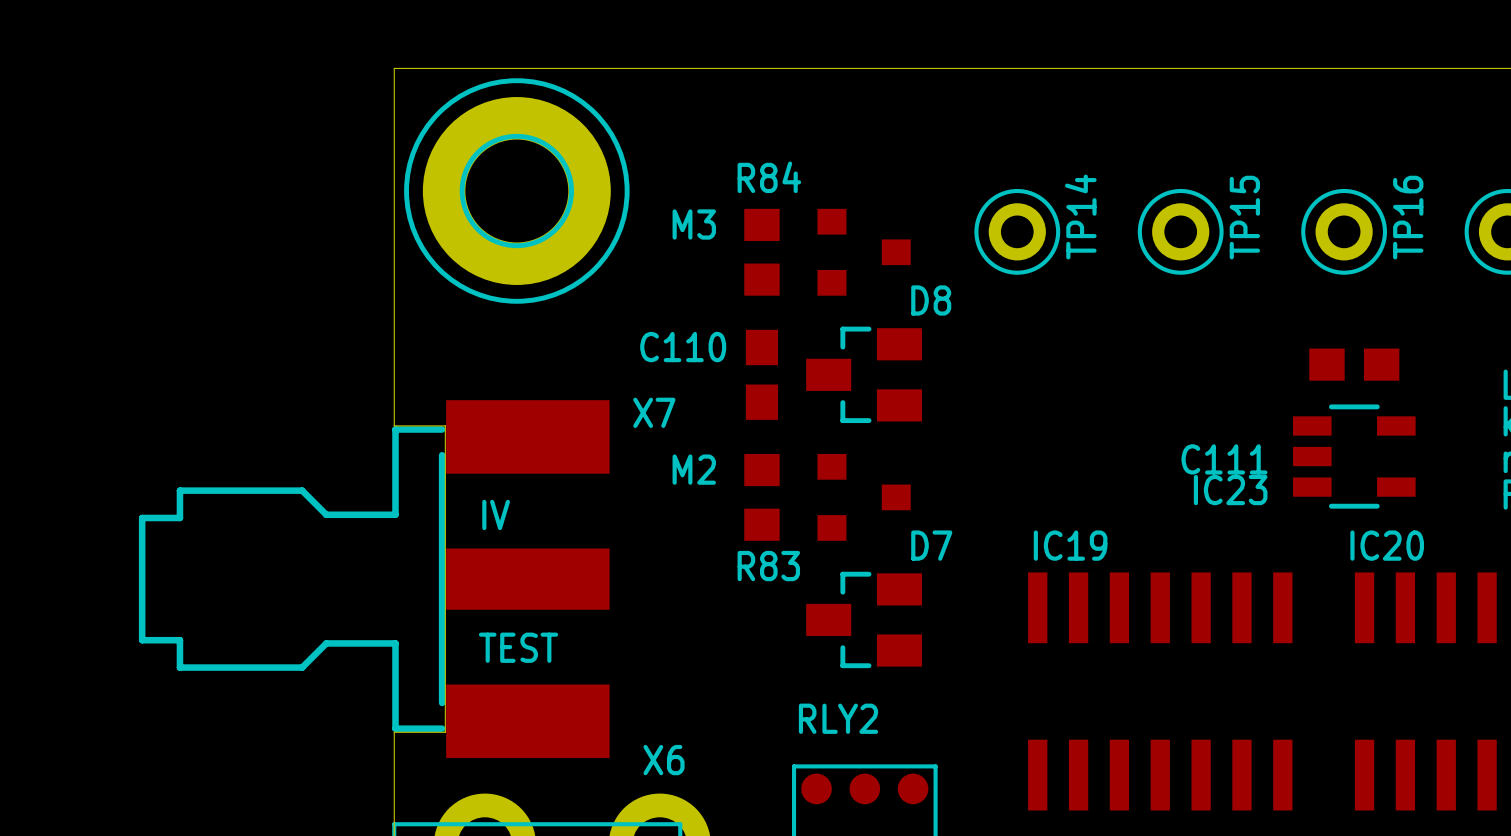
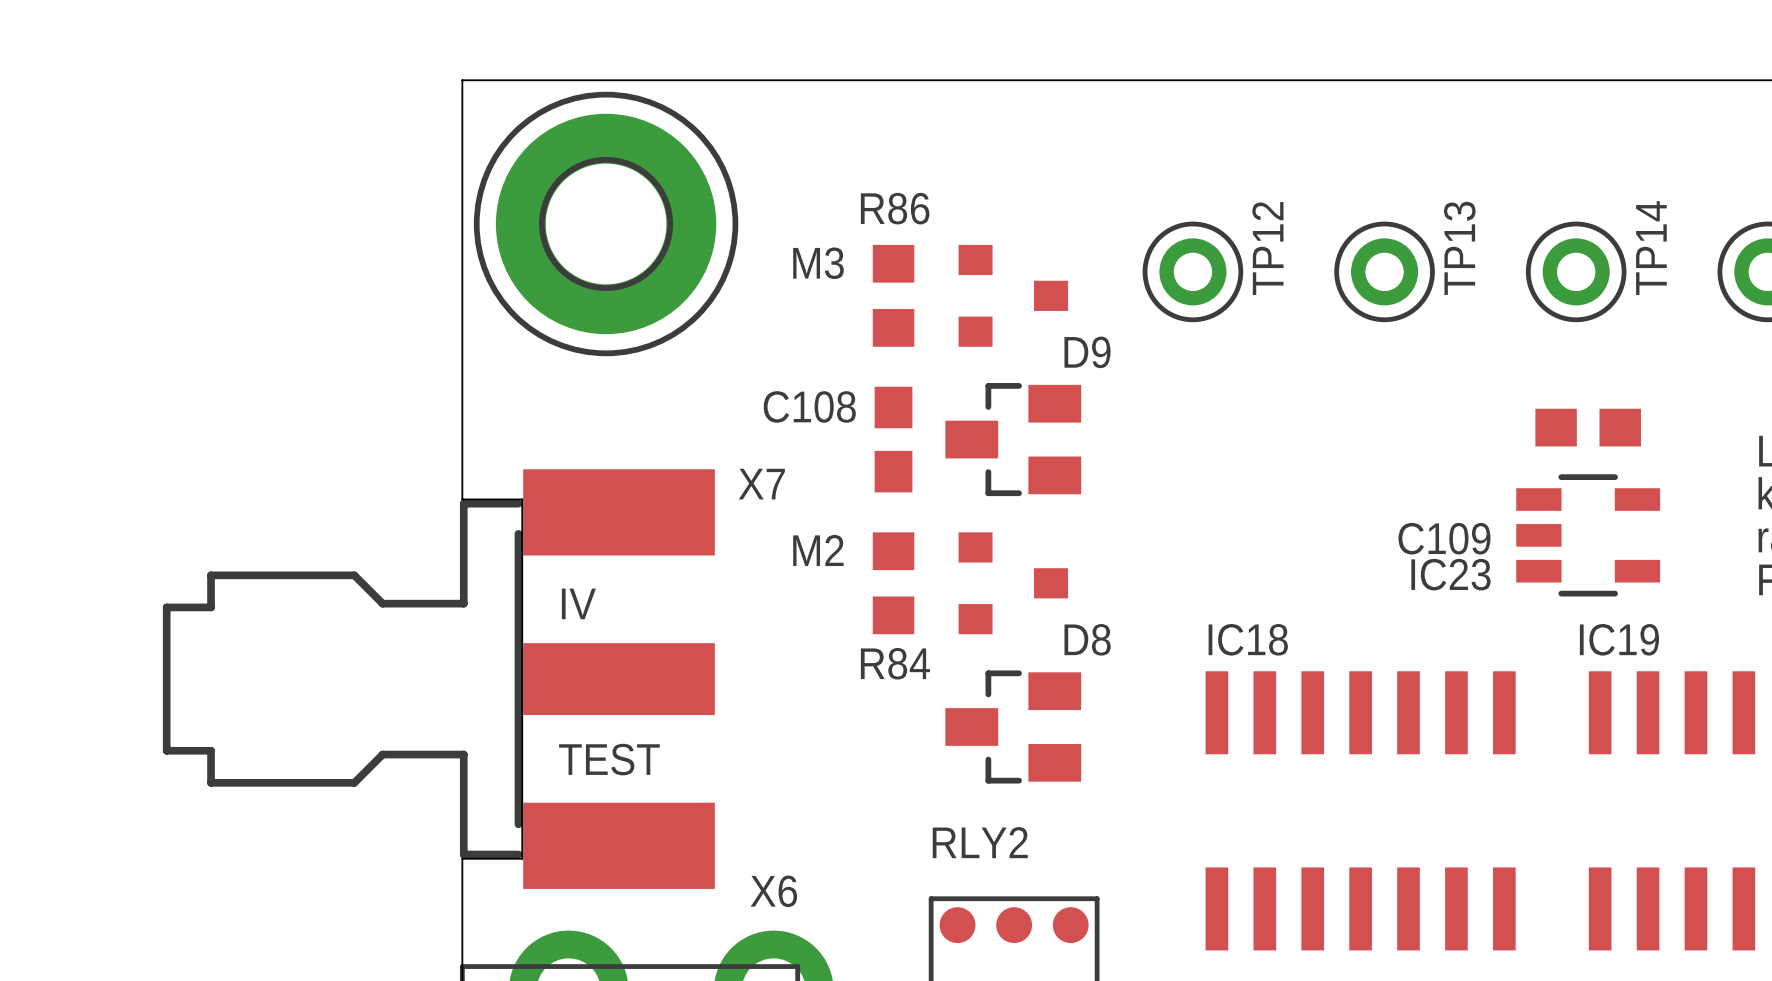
R84 name: R84 (769, 177) -> R86 (895, 208)
TP14 name: TP14 (1080, 217) -> TP12 (1267, 248)
TP15 name: TP15 (1244, 217) -> TP13 (1459, 248)
TP16 name: TP16 (1408, 217) -> TP14 (1651, 248)
D8 name: D8 (931, 300) -> D9 (1087, 352)
C110 name: C110 (683, 347) -> C108 (809, 406)
C111 name: C111 (1224, 459) -> C109 (1444, 538)
D7 name: D7 (931, 545) -> D8 (1087, 639)
IC19 name: IC19 (1070, 545) -> IC18 (1248, 639)
IC20 name: IC20 (1387, 545) -> IC19 (1619, 639)
R83 name: R83 (768, 566) -> R84 (895, 663)

